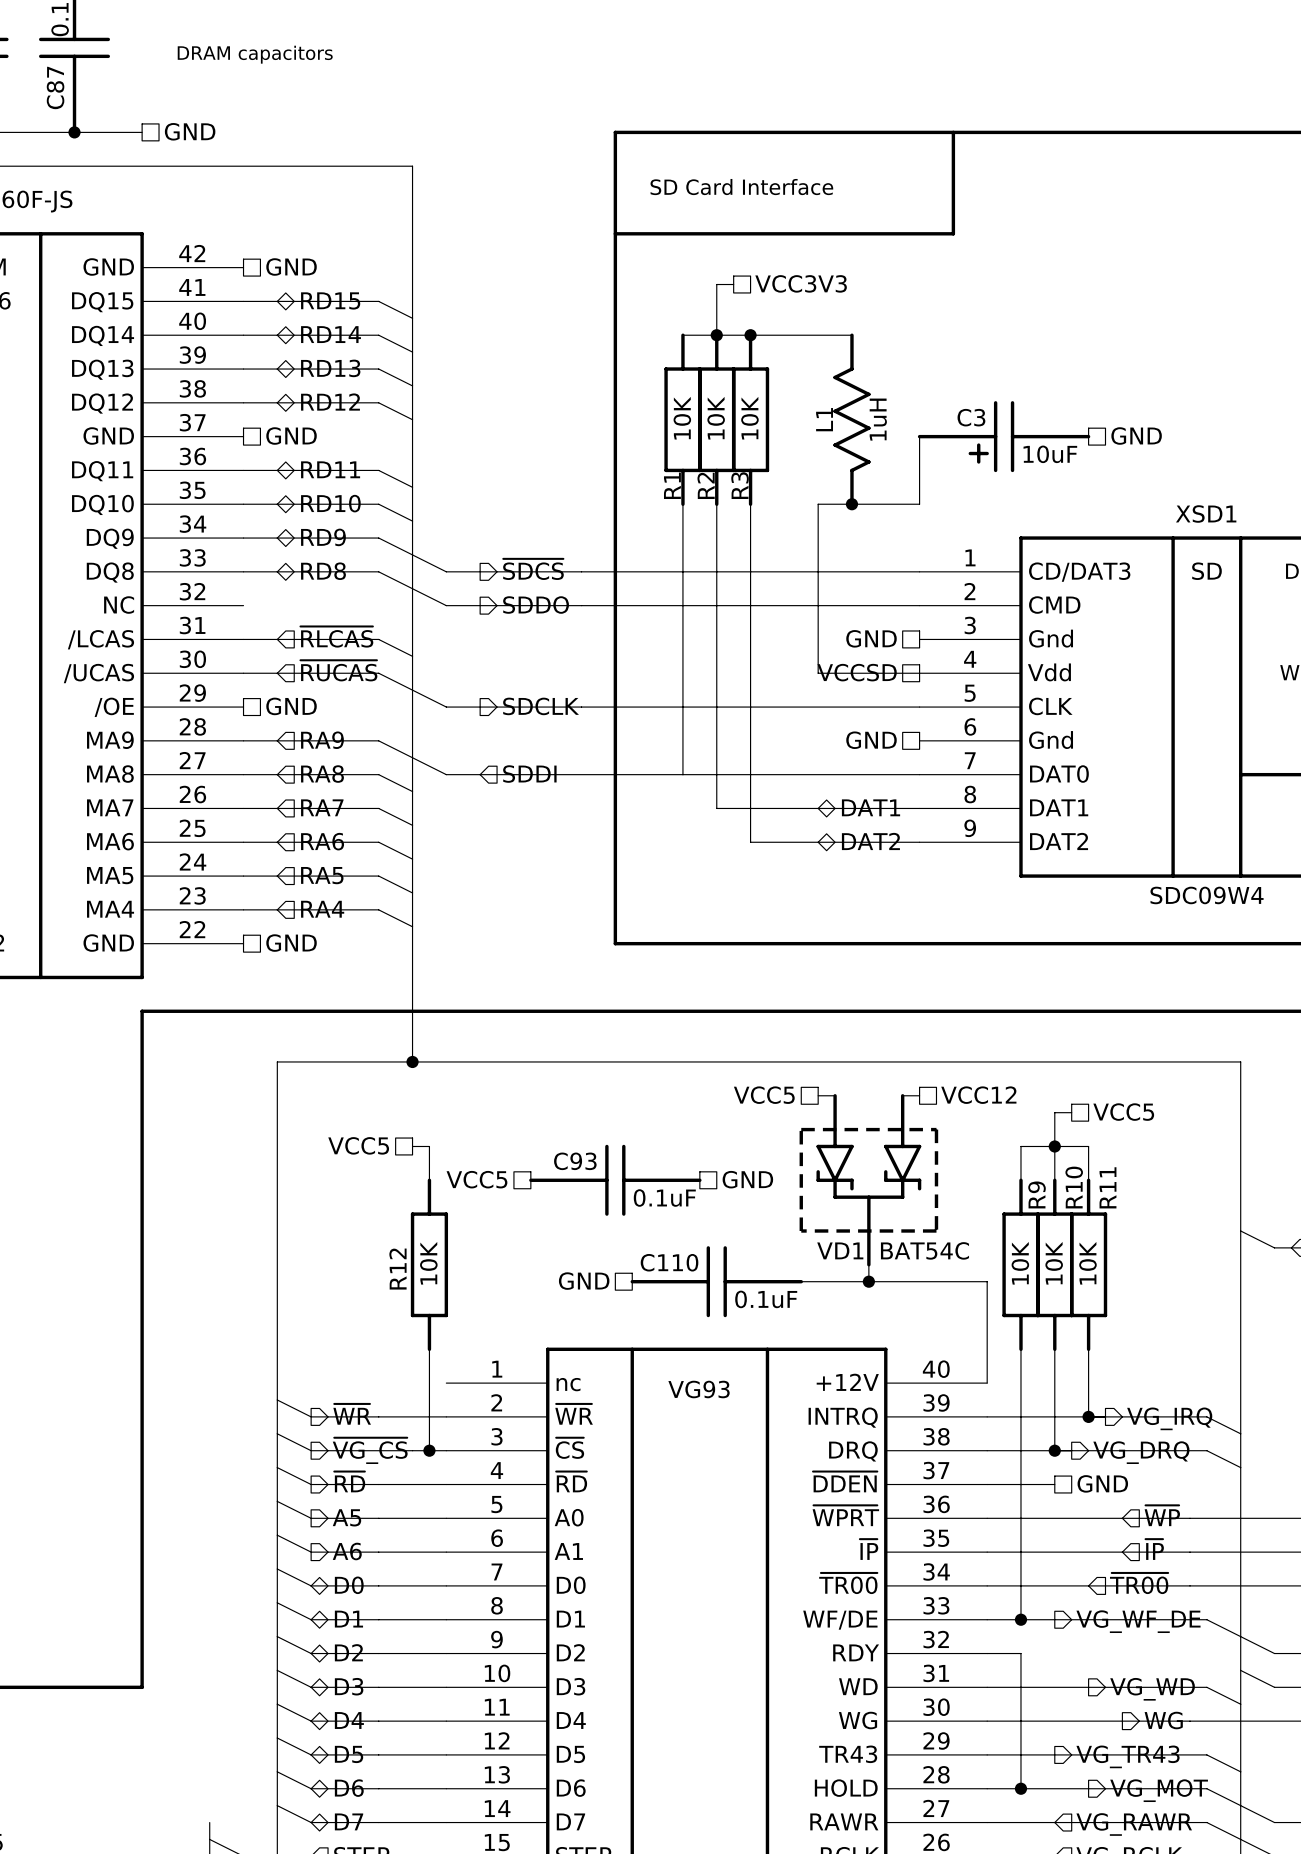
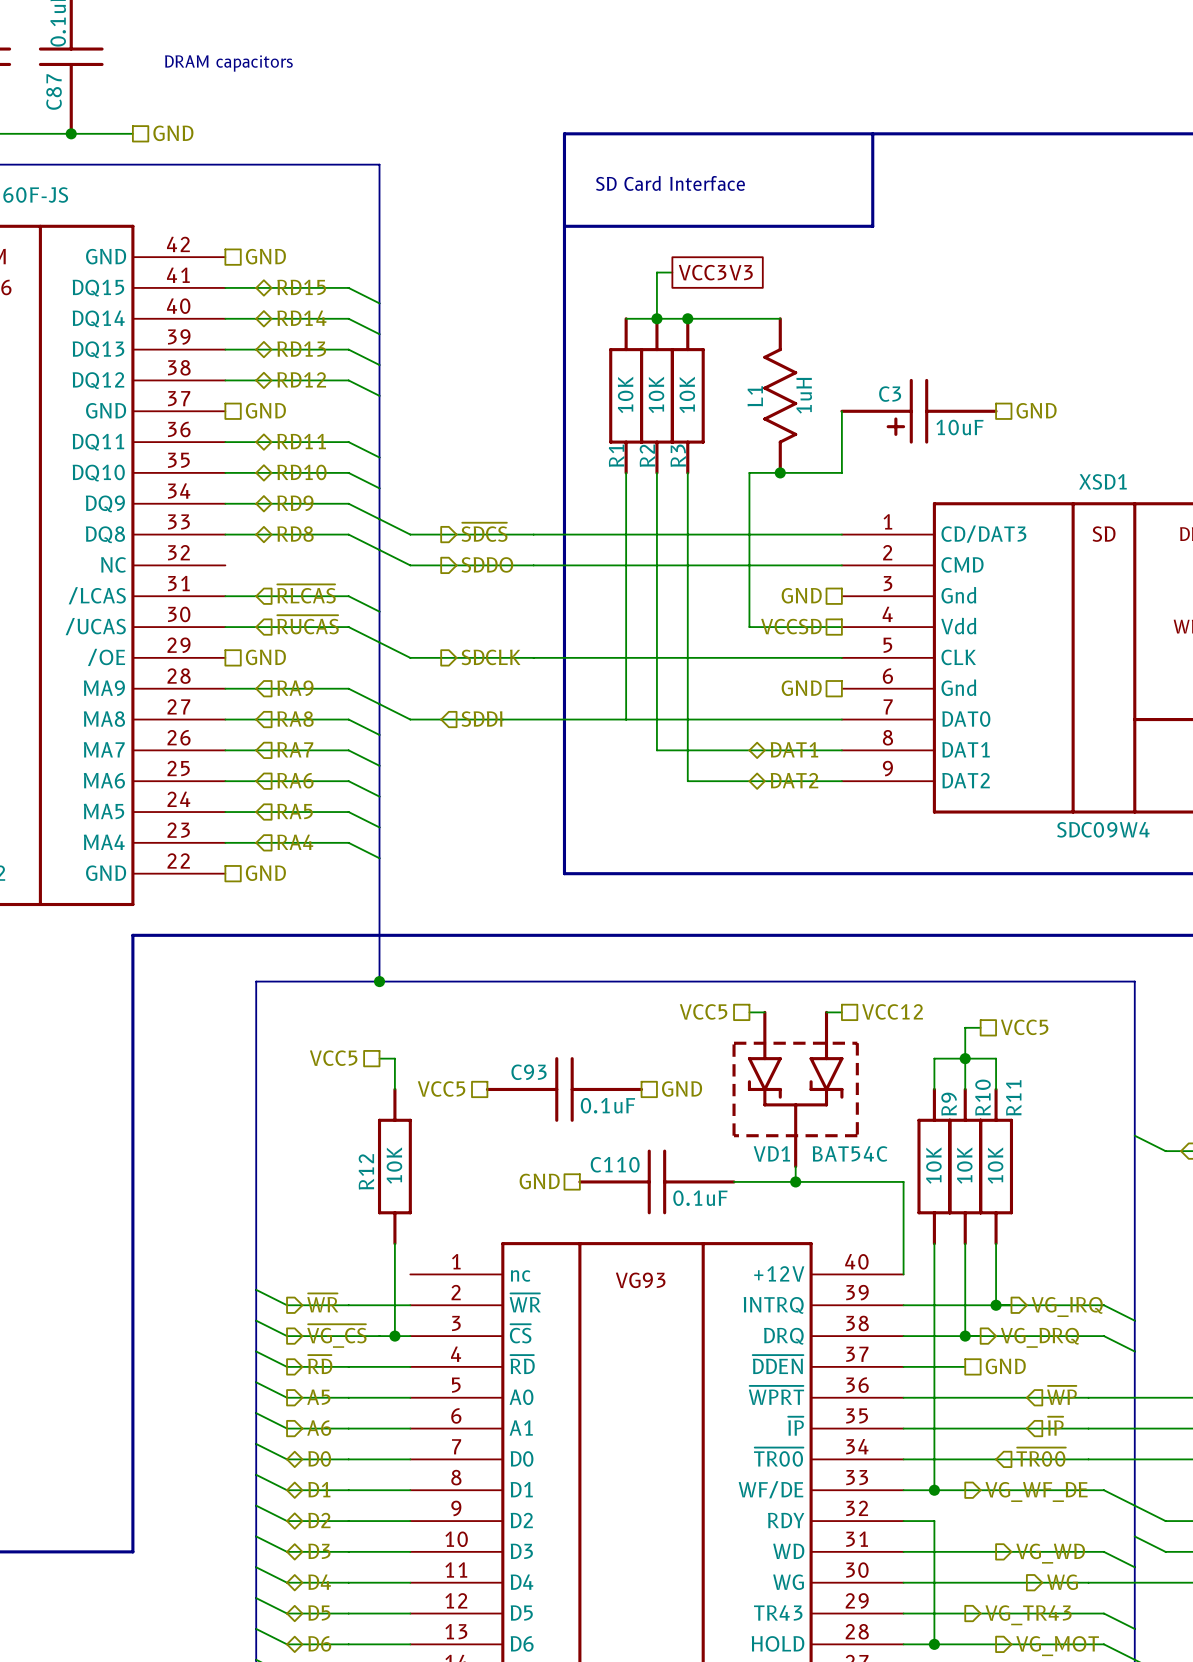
hierarchical label: VCC3V3 (801, 283) -> none
global label: none -> VCC3V3 (715, 272)

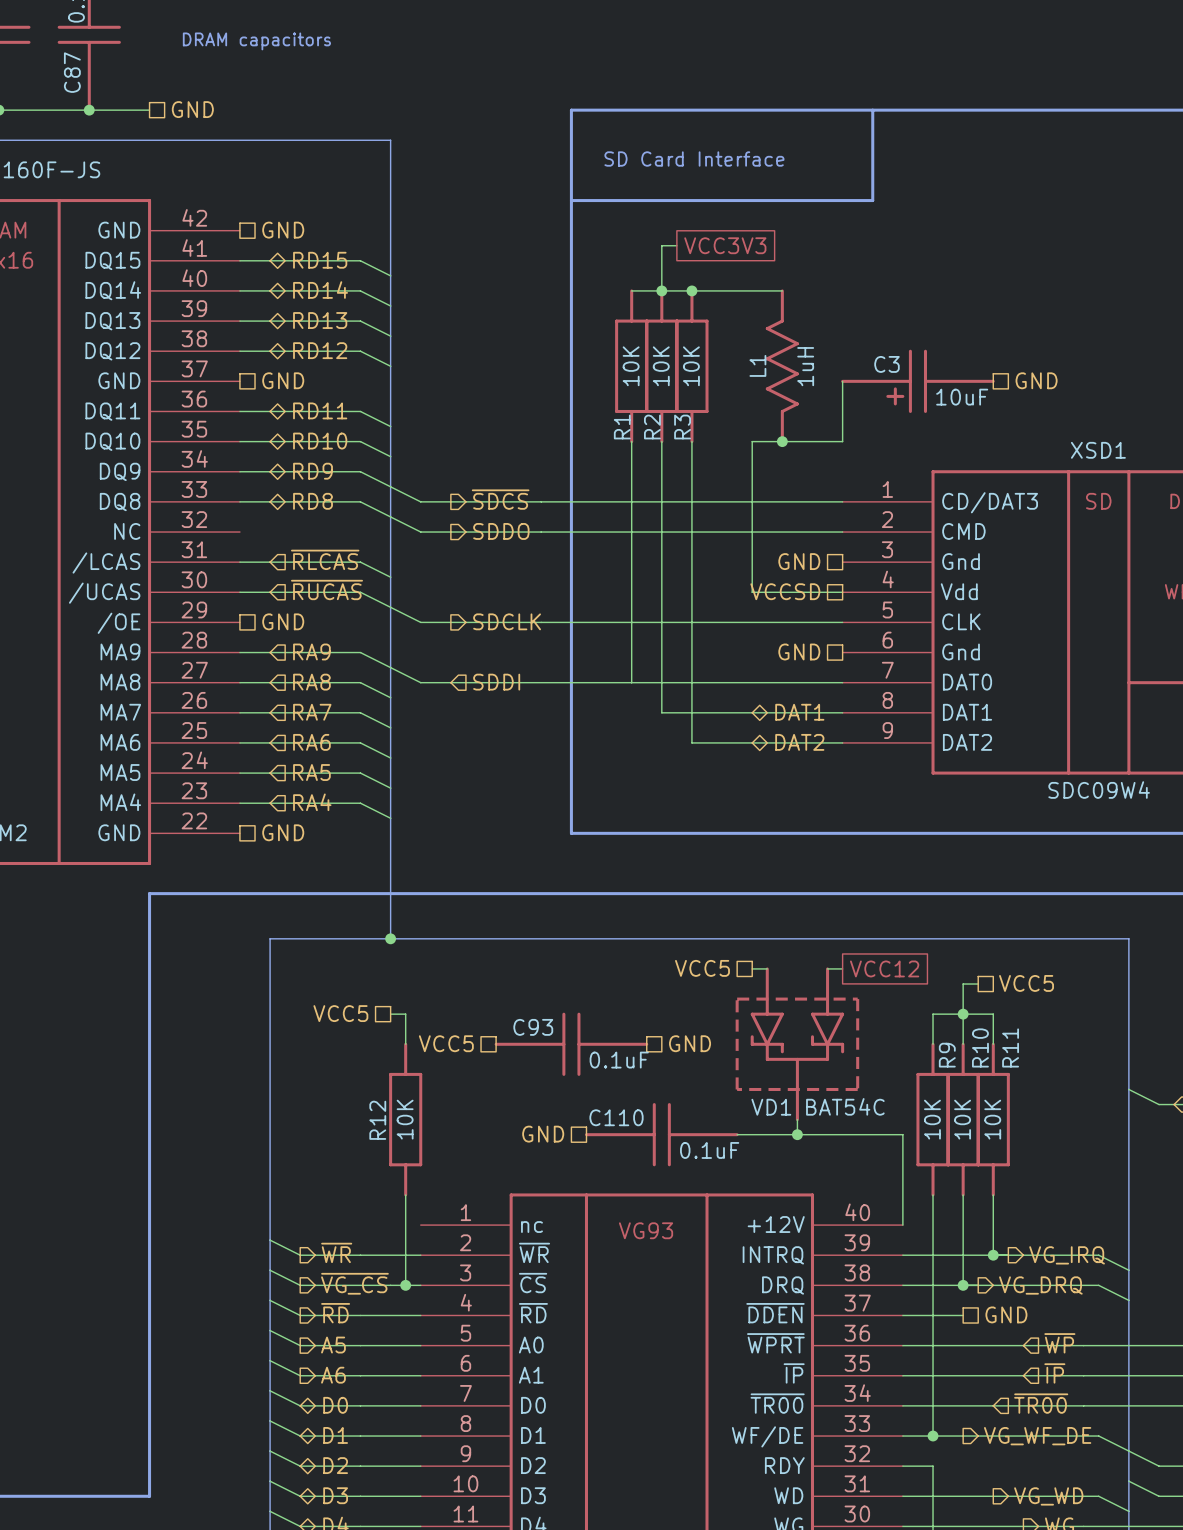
hierarchical label: VCC12 (892, 1011) -> none
global label: none -> VCC12 (884, 968)

